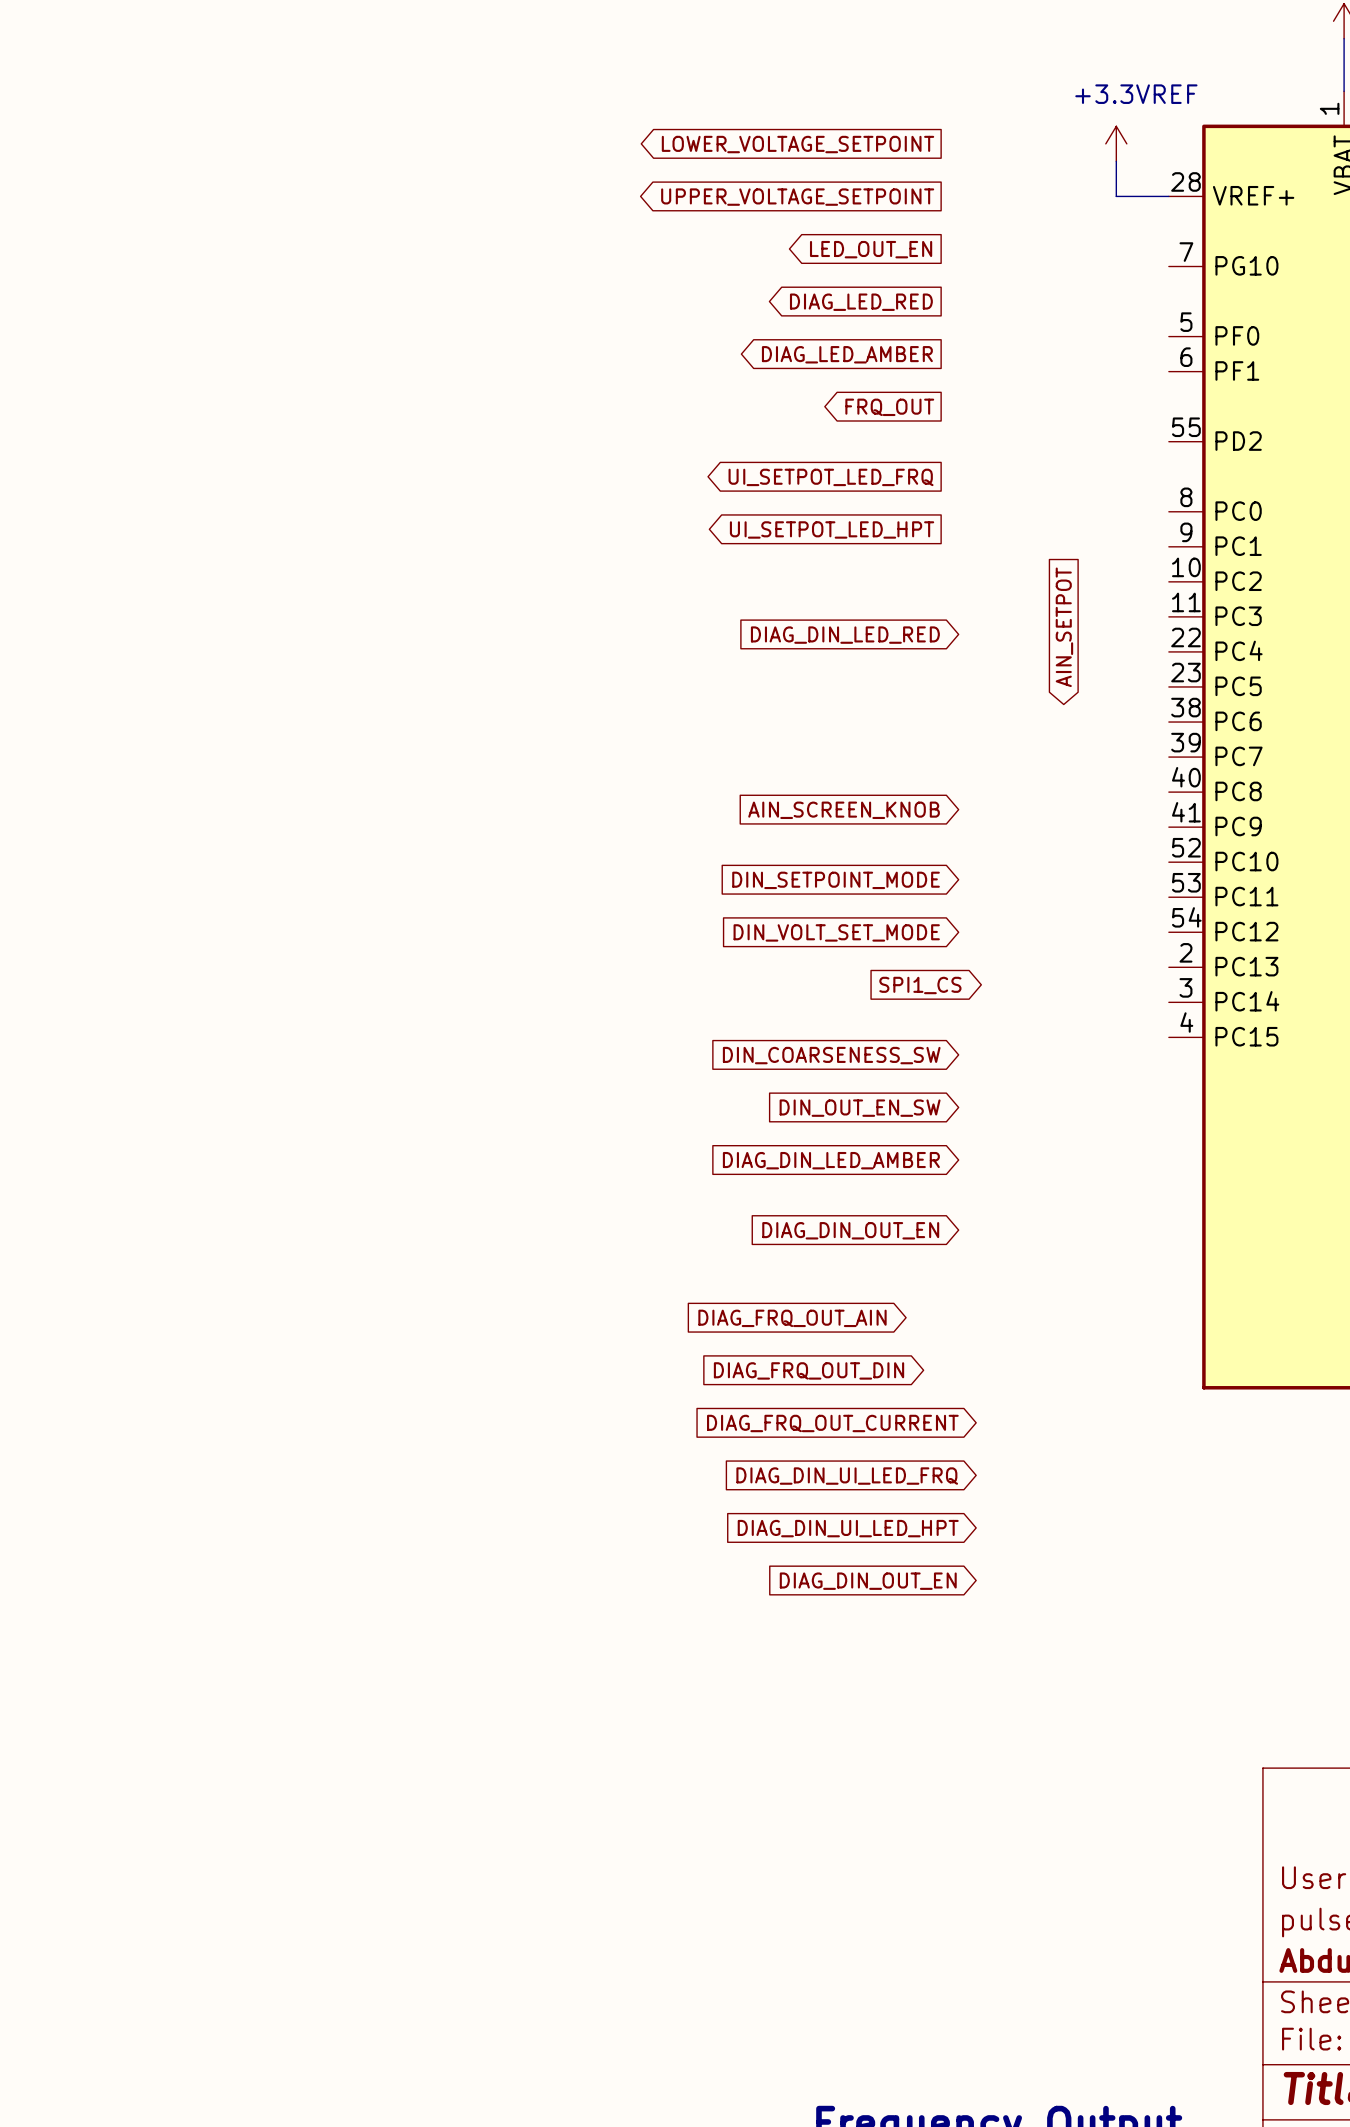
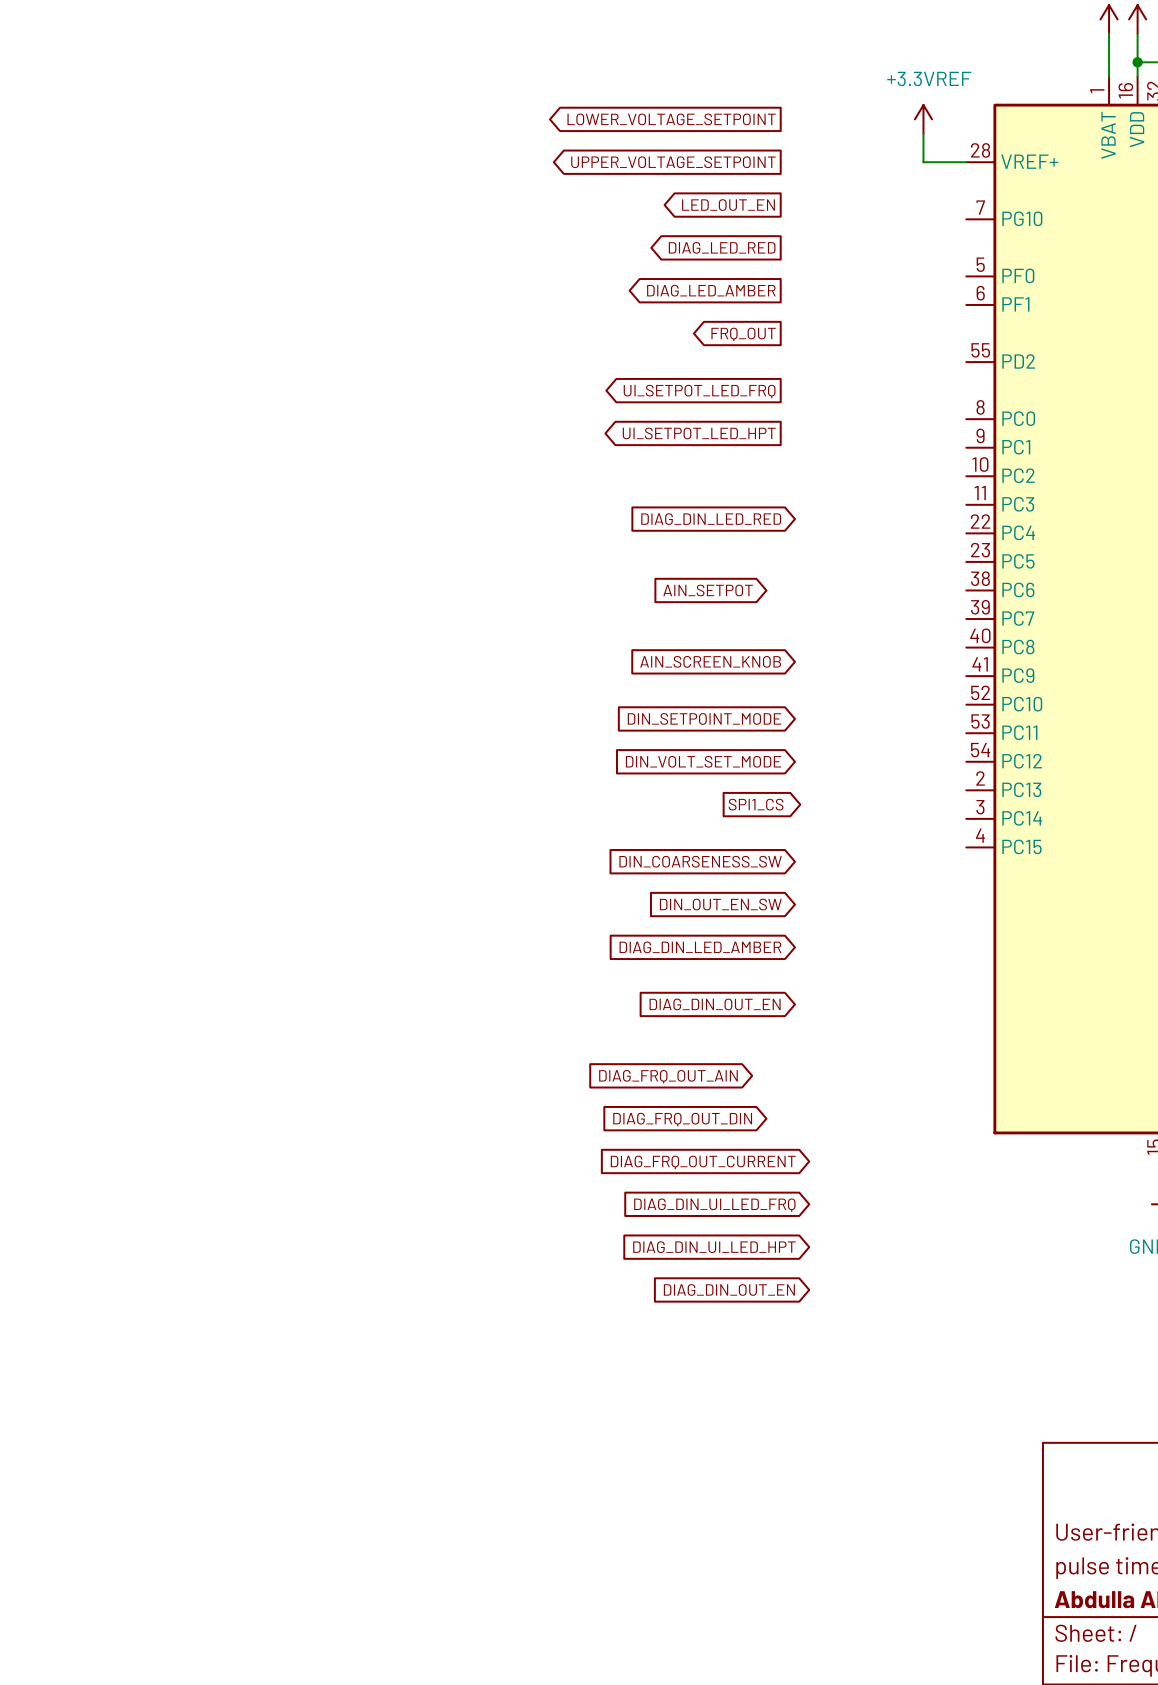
global label rotation: 0° (1064, 627) -> 90° counterclockwise (708, 590)
global label position: AIN_SETPOT (1064, 627) -> AIN_SETPOT (708, 590)

